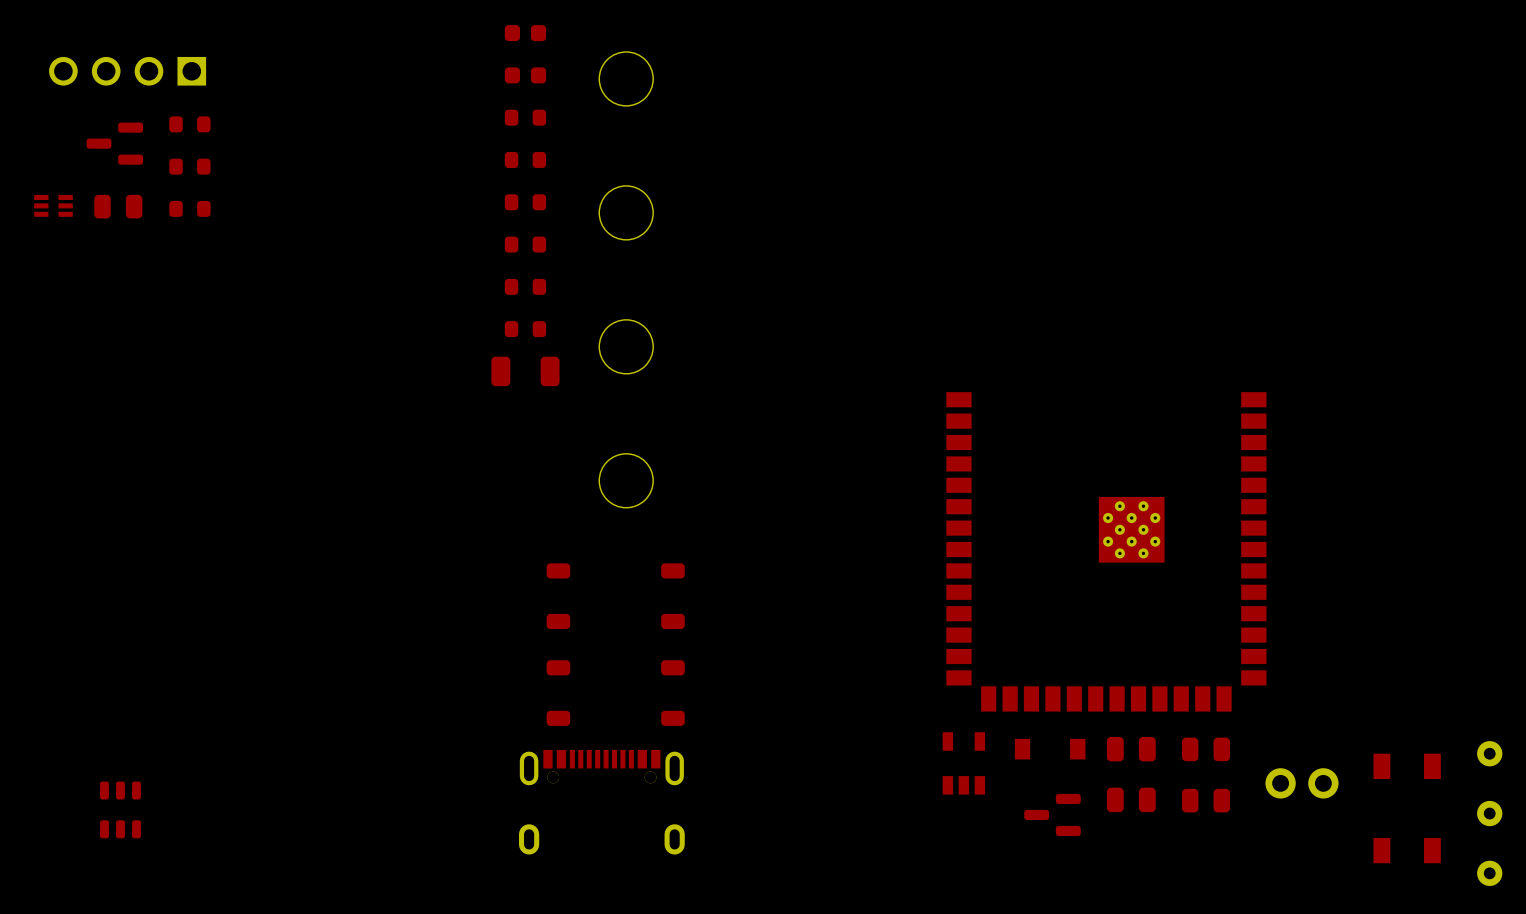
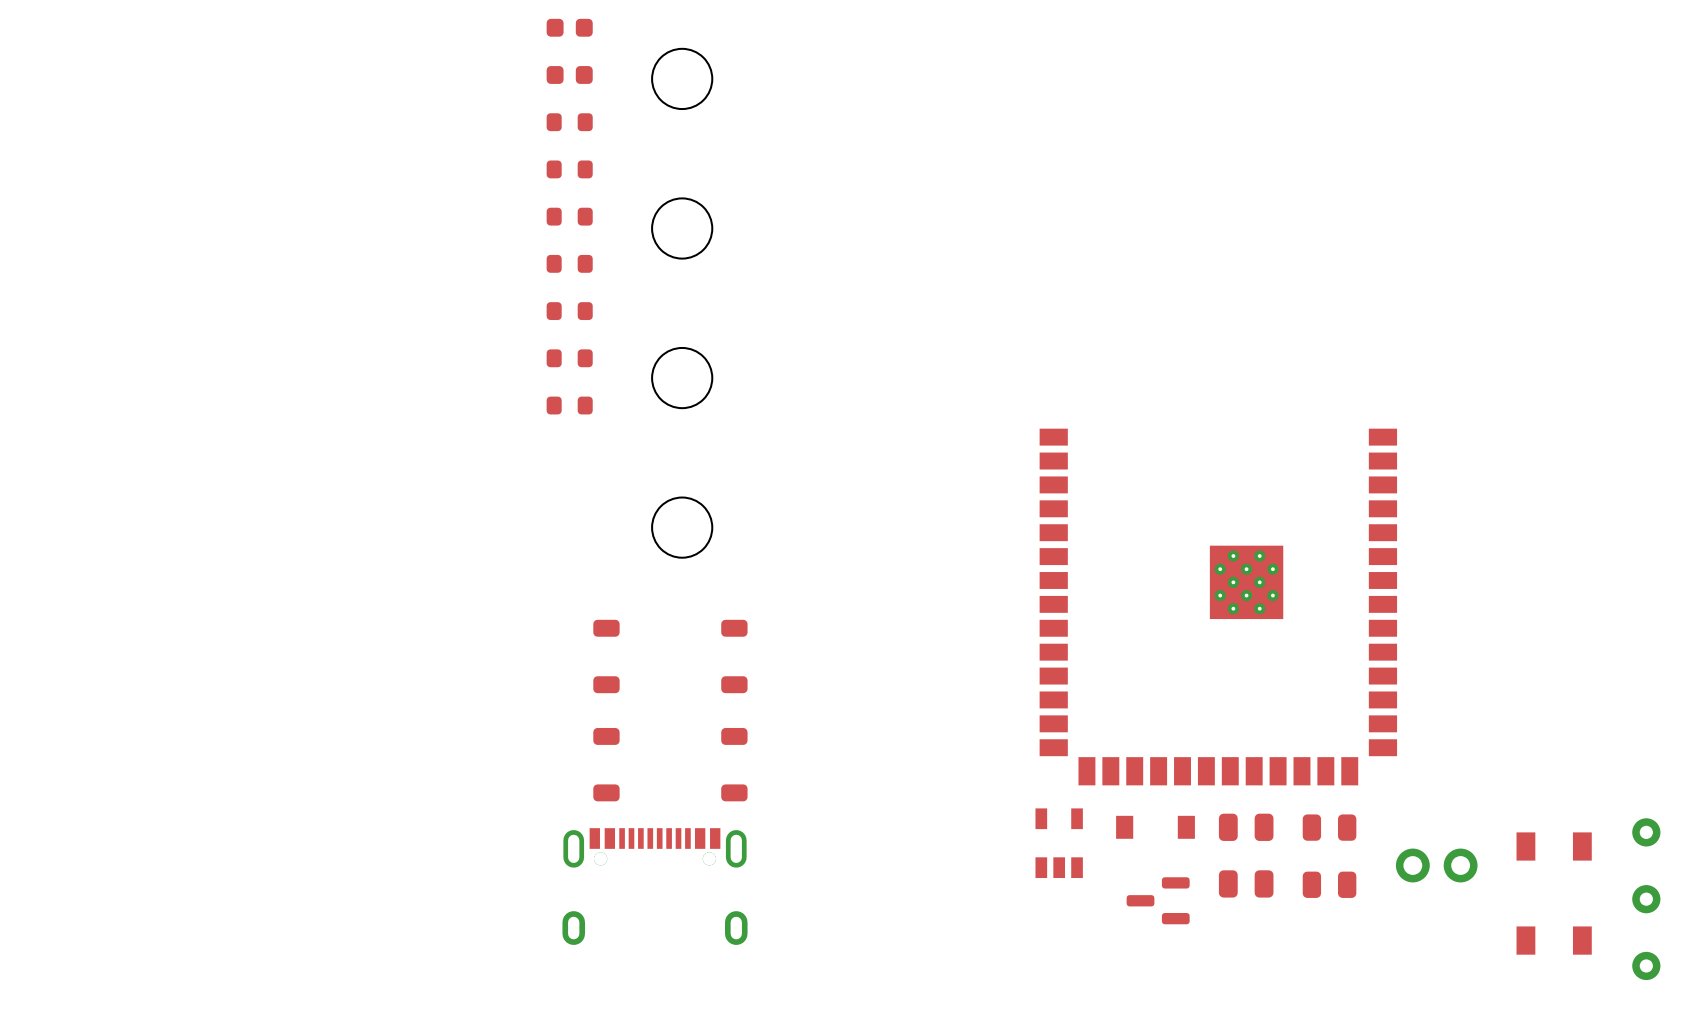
part: (127, 71) -> none
part: (189, 124) -> none
part: (114, 143) -> none
part: (189, 166) -> none
part: (53, 205) -> none
part: (118, 206) -> none
part: (189, 208) -> none
part footprint: [491, 356, 560, 387] -> [546, 396, 593, 415]
part: (120, 809) -> none

